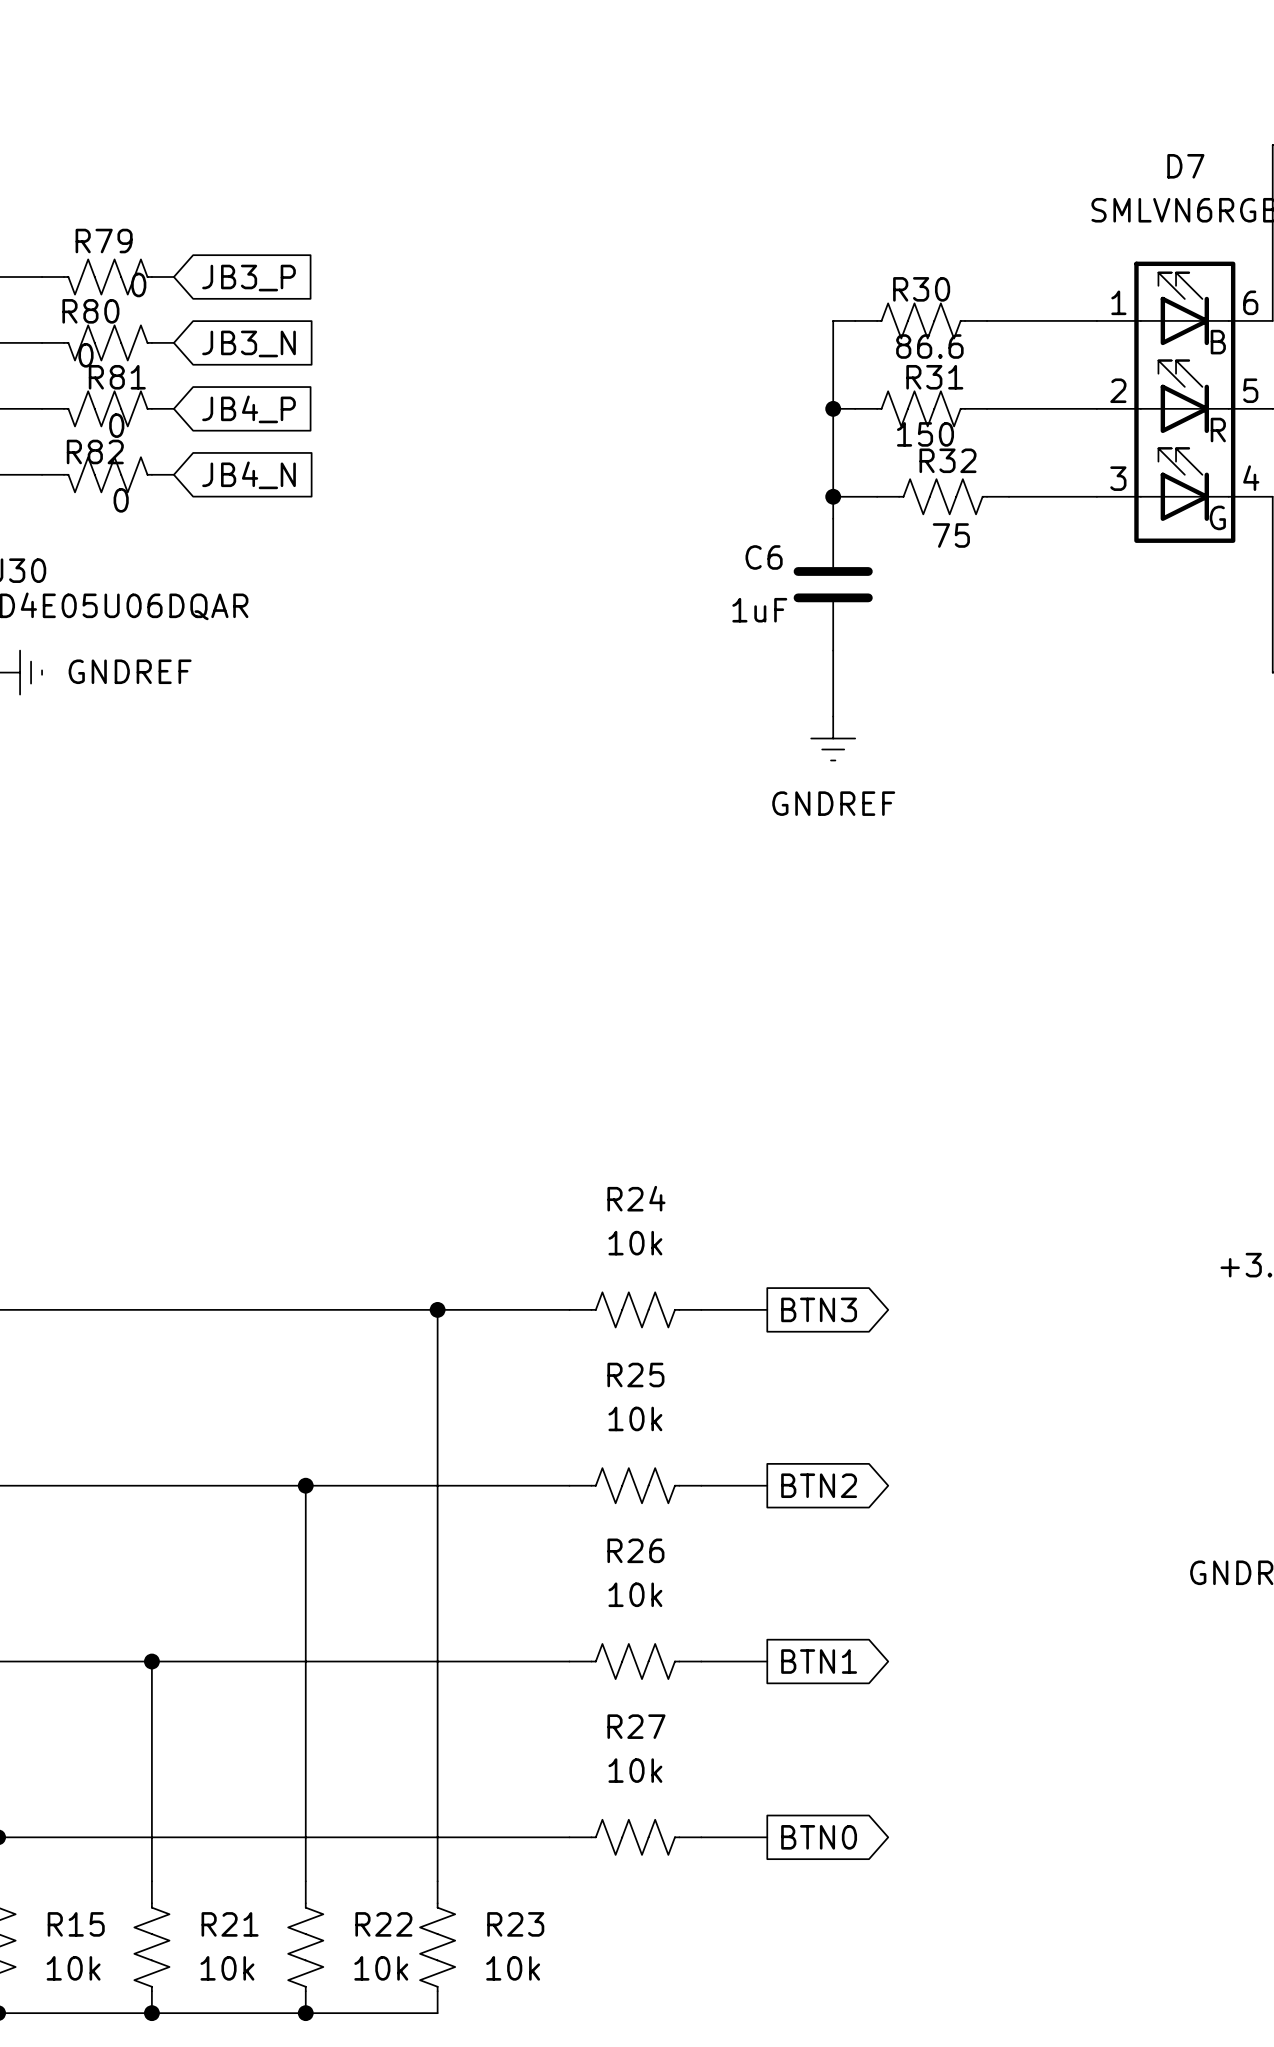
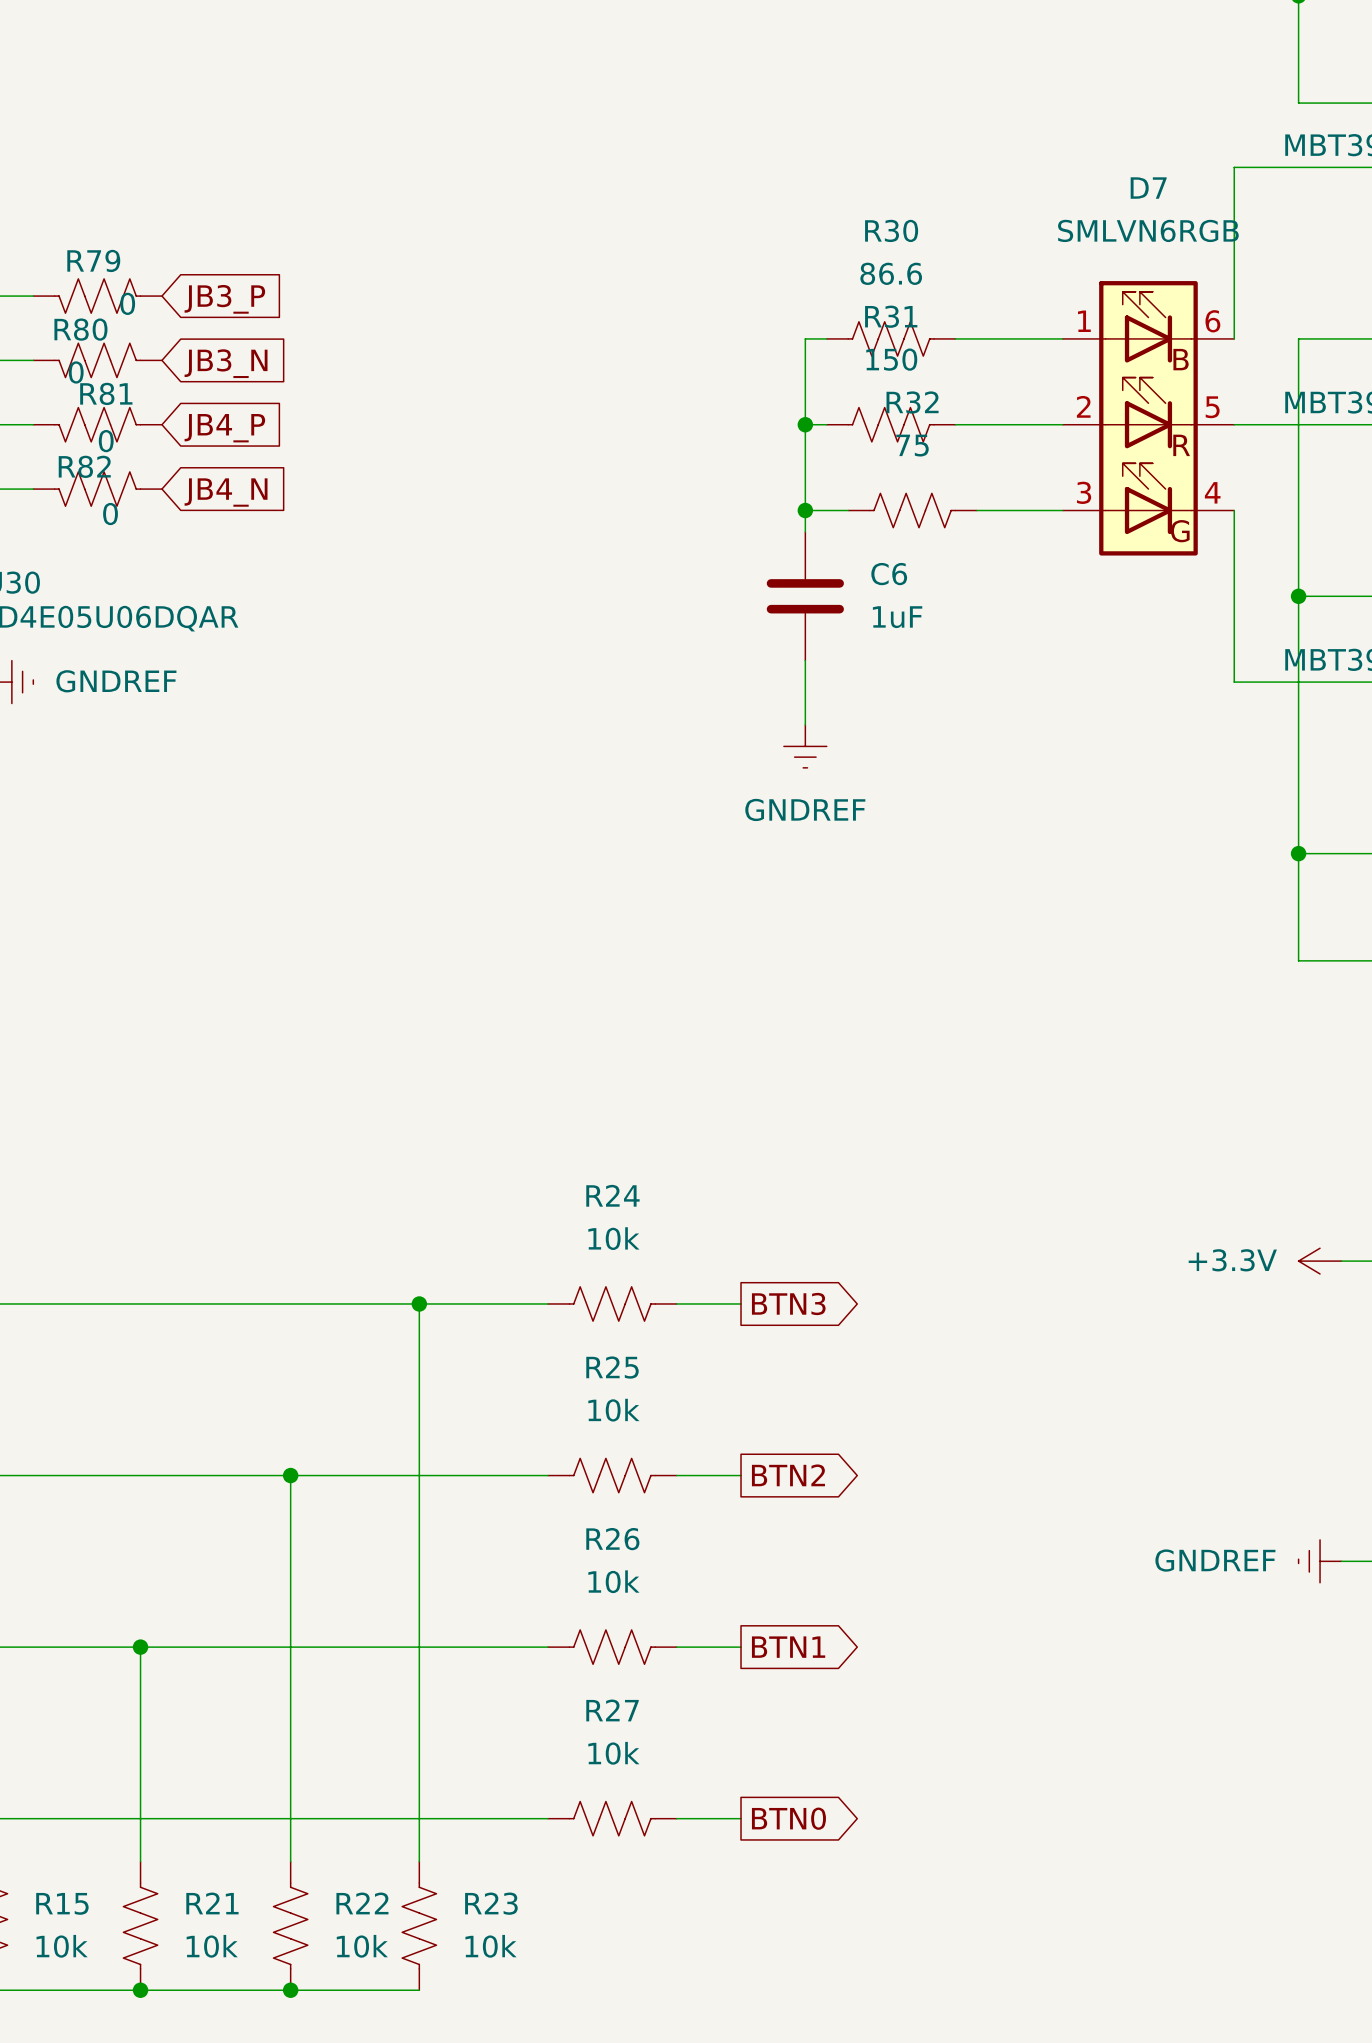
R30 name position: R30 (921, 289) -> R30 (891, 230)
R30 value position: 86.6 (929, 346) -> 86.6 (891, 273)
R31 name position: R31 (934, 377) -> R31 (891, 316)
R31 value position: 150 (925, 434) -> 150 (891, 359)
R32 name position: R32 (948, 460) -> R32 (912, 402)
R32 value position: 75 (951, 535) -> 75 (912, 445)
C6 name position: C6 (764, 557) -> C6 (889, 574)
C6 value position: 1uF (759, 610) -> 1uF (897, 617)

